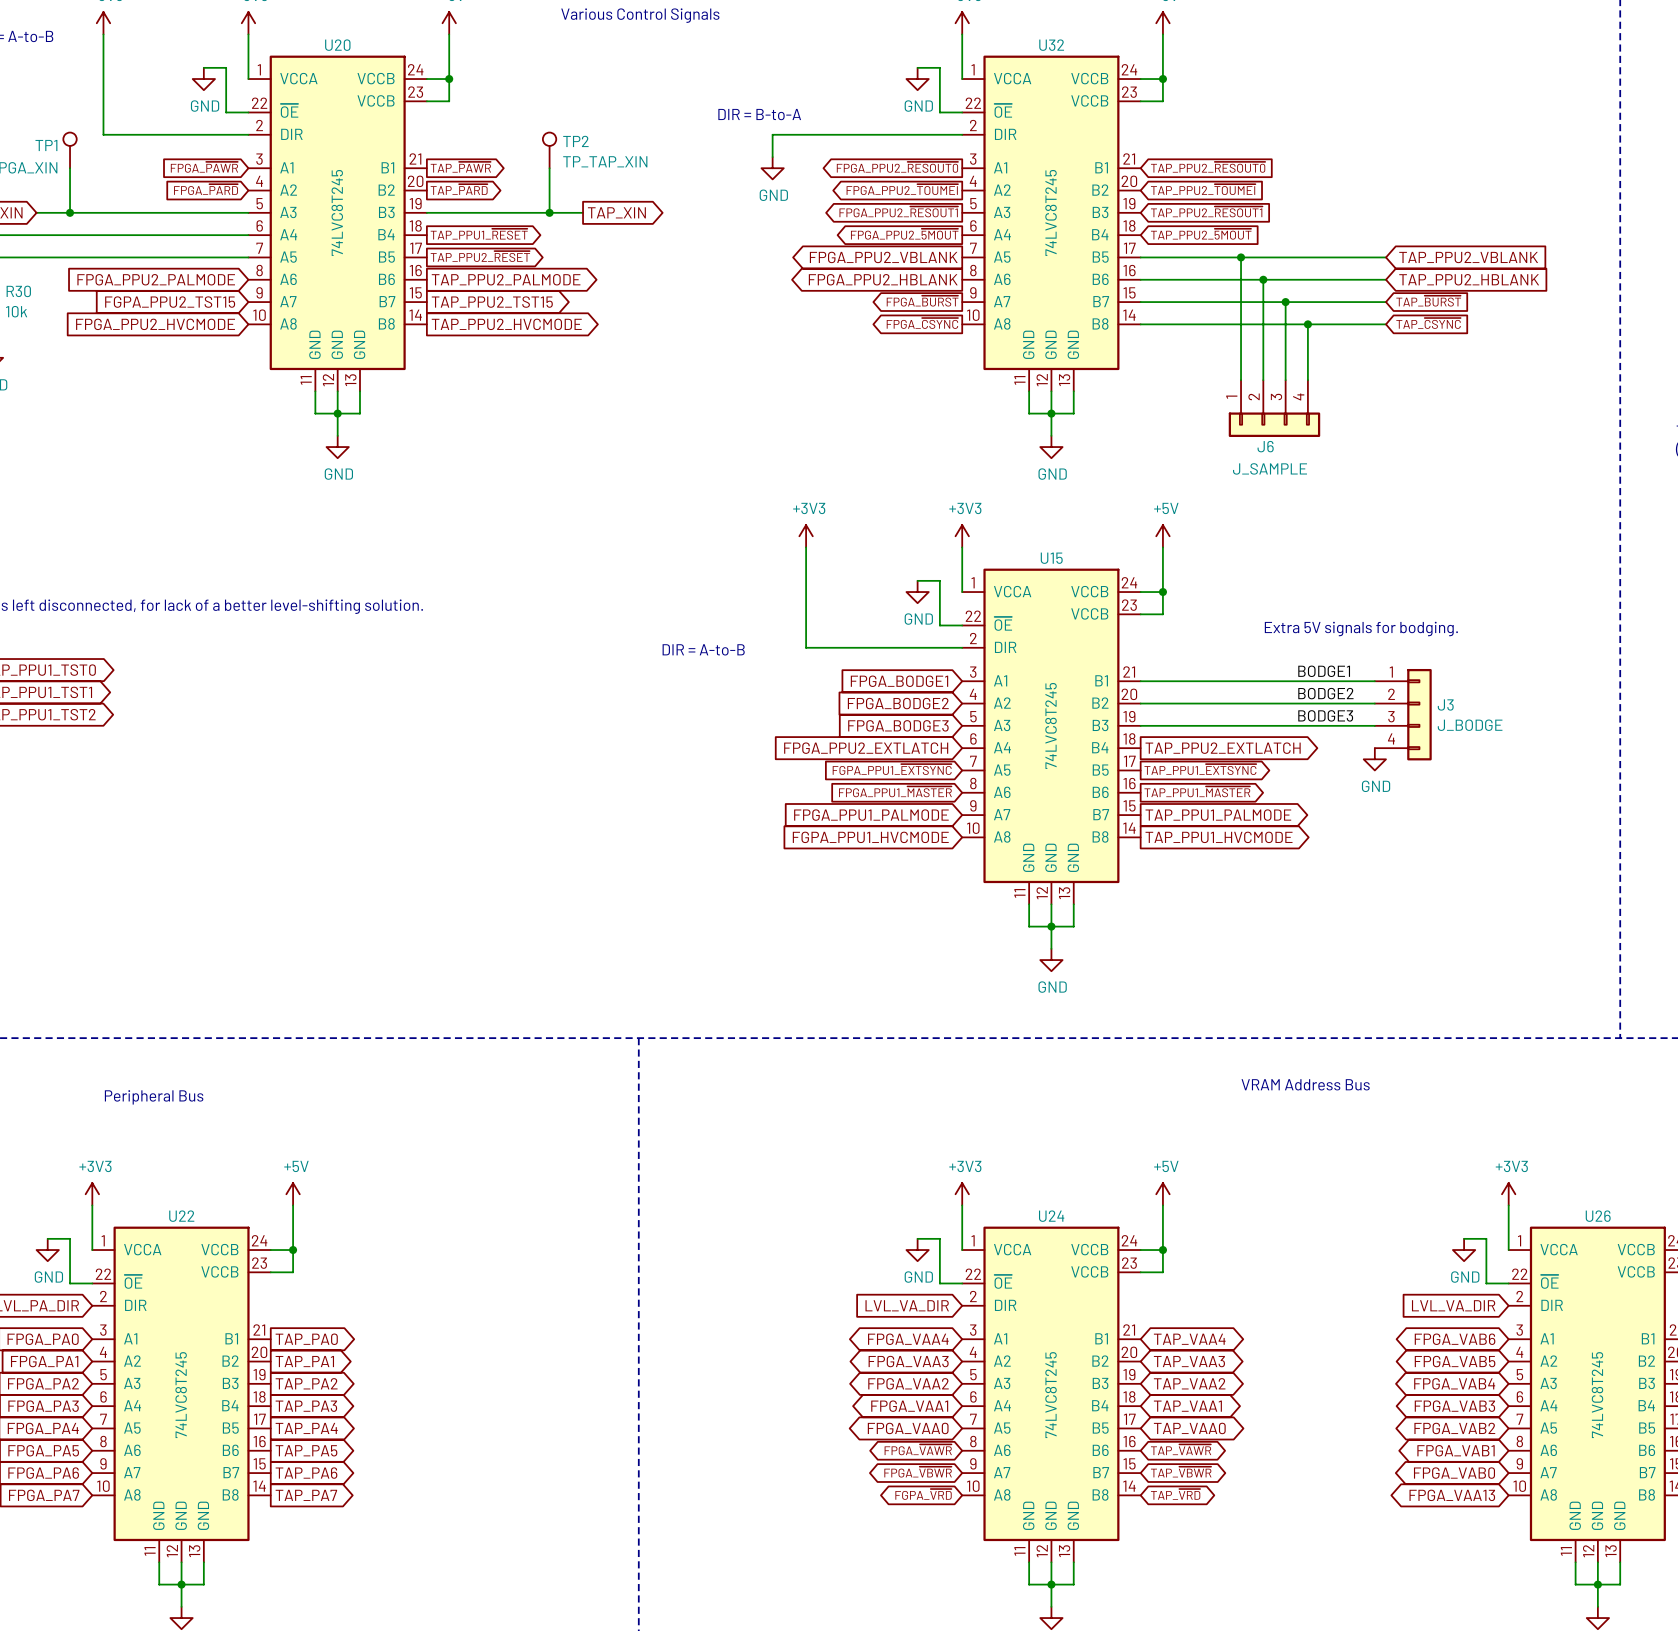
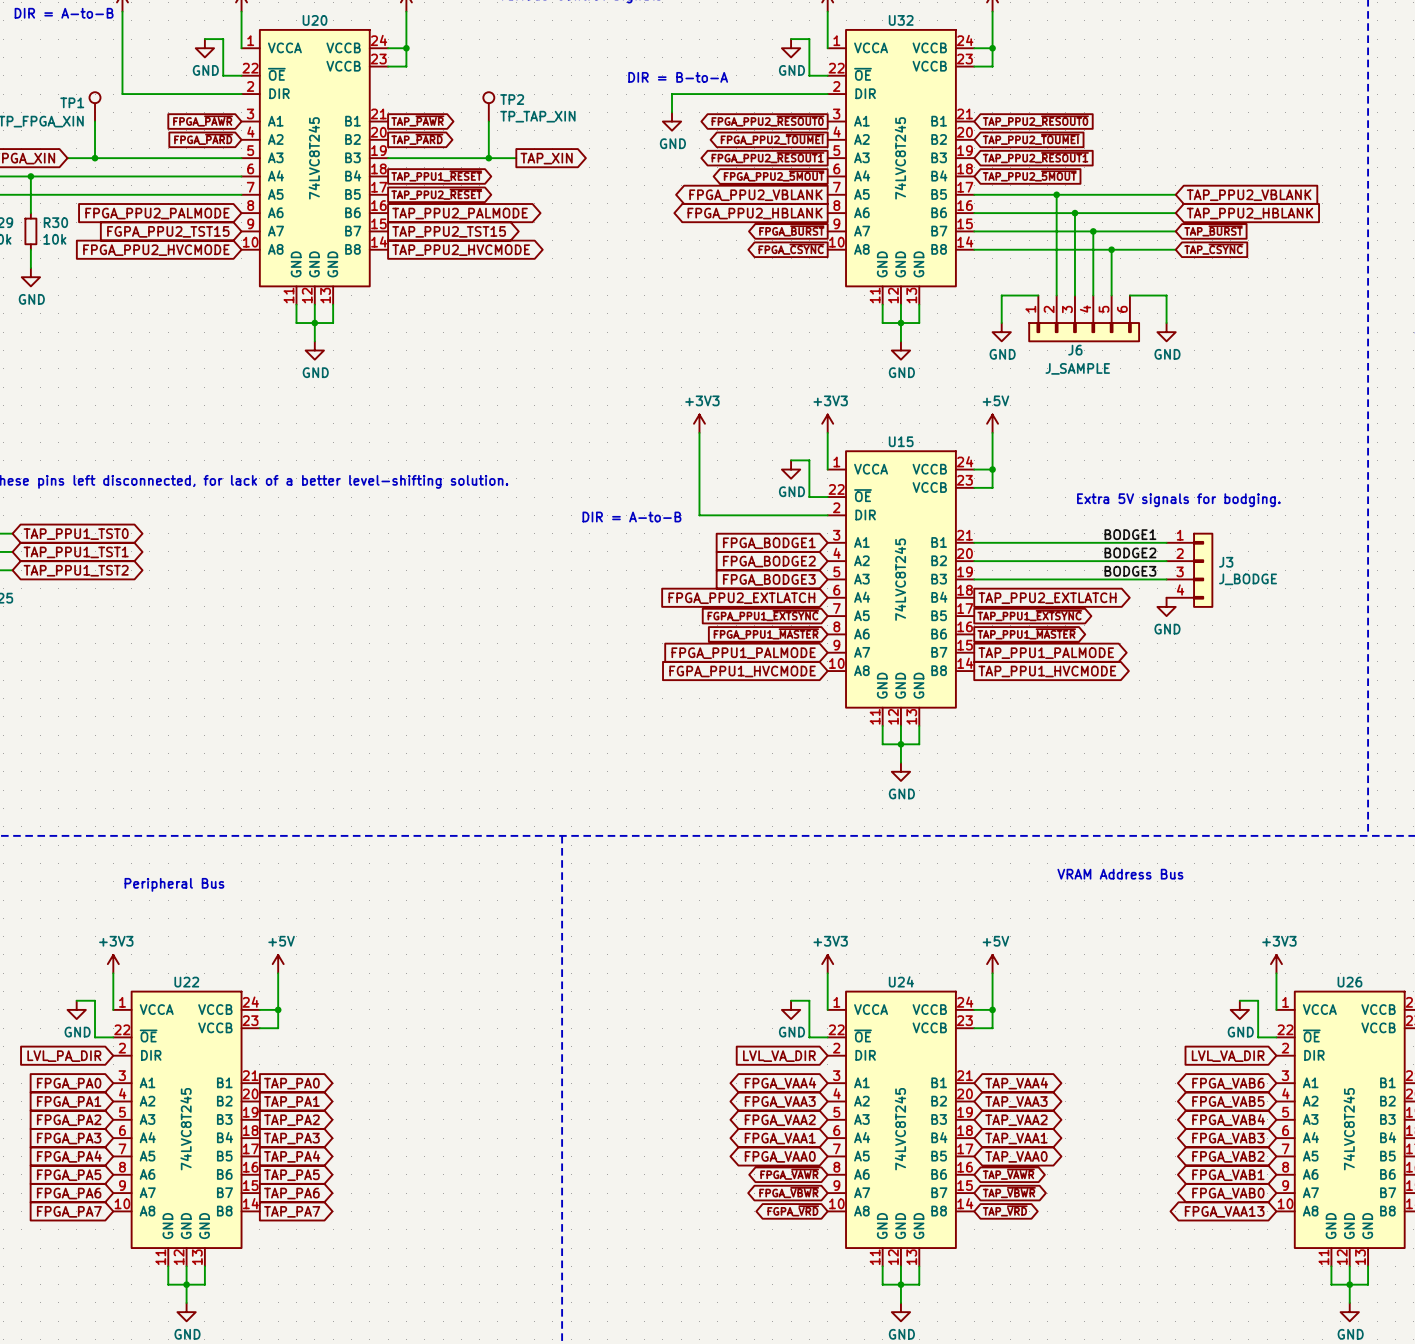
wire: none -> (1038, 295) (1001, 295) (1001, 323)
J6 symbol: [1228, 380, 1321, 438] -> [1028, 295, 1141, 343]
wire: none -> (1129, 295) (1166, 295) (1166, 323)
power symbol: none -> GND (1001, 332)
power symbol: none -> GND (1166, 332)

